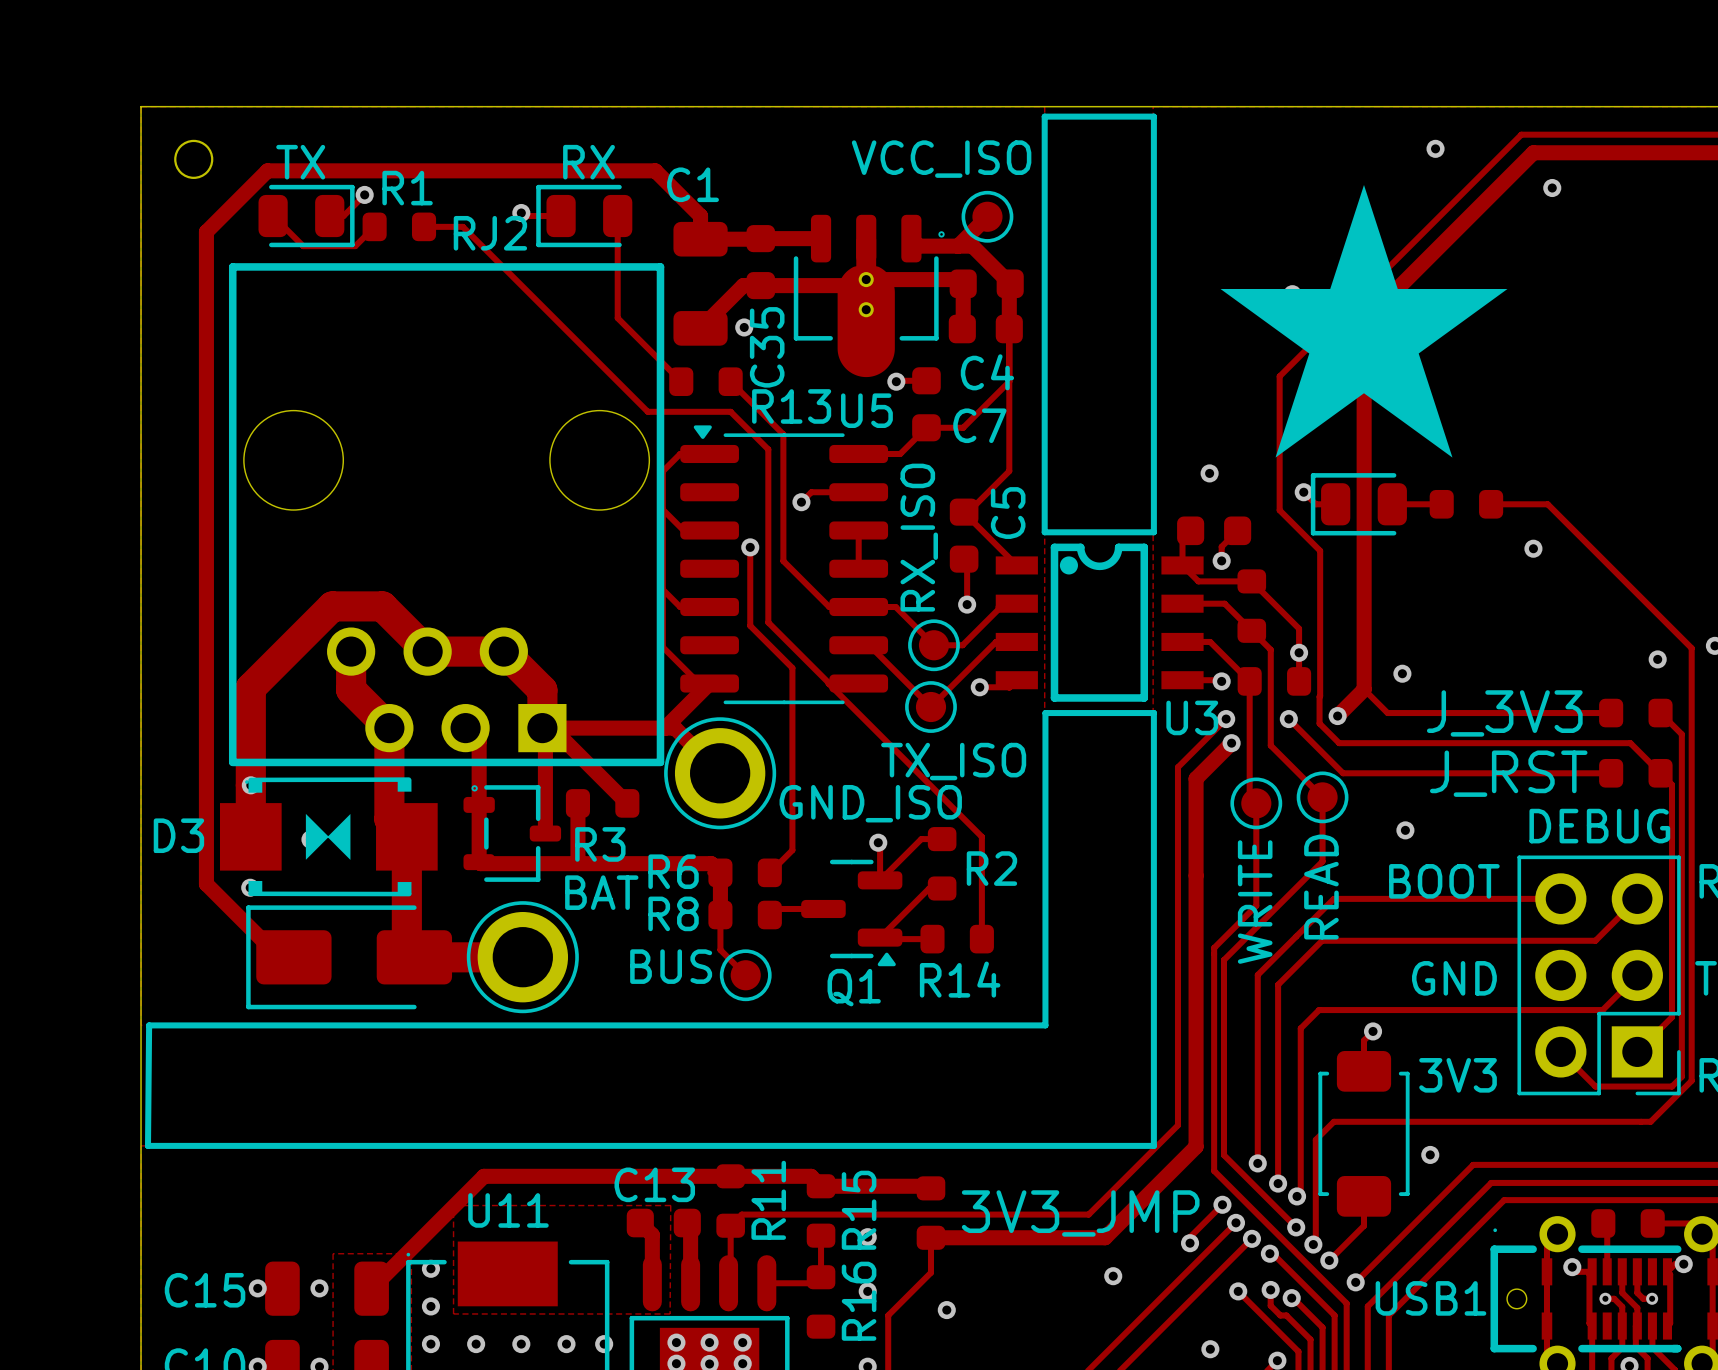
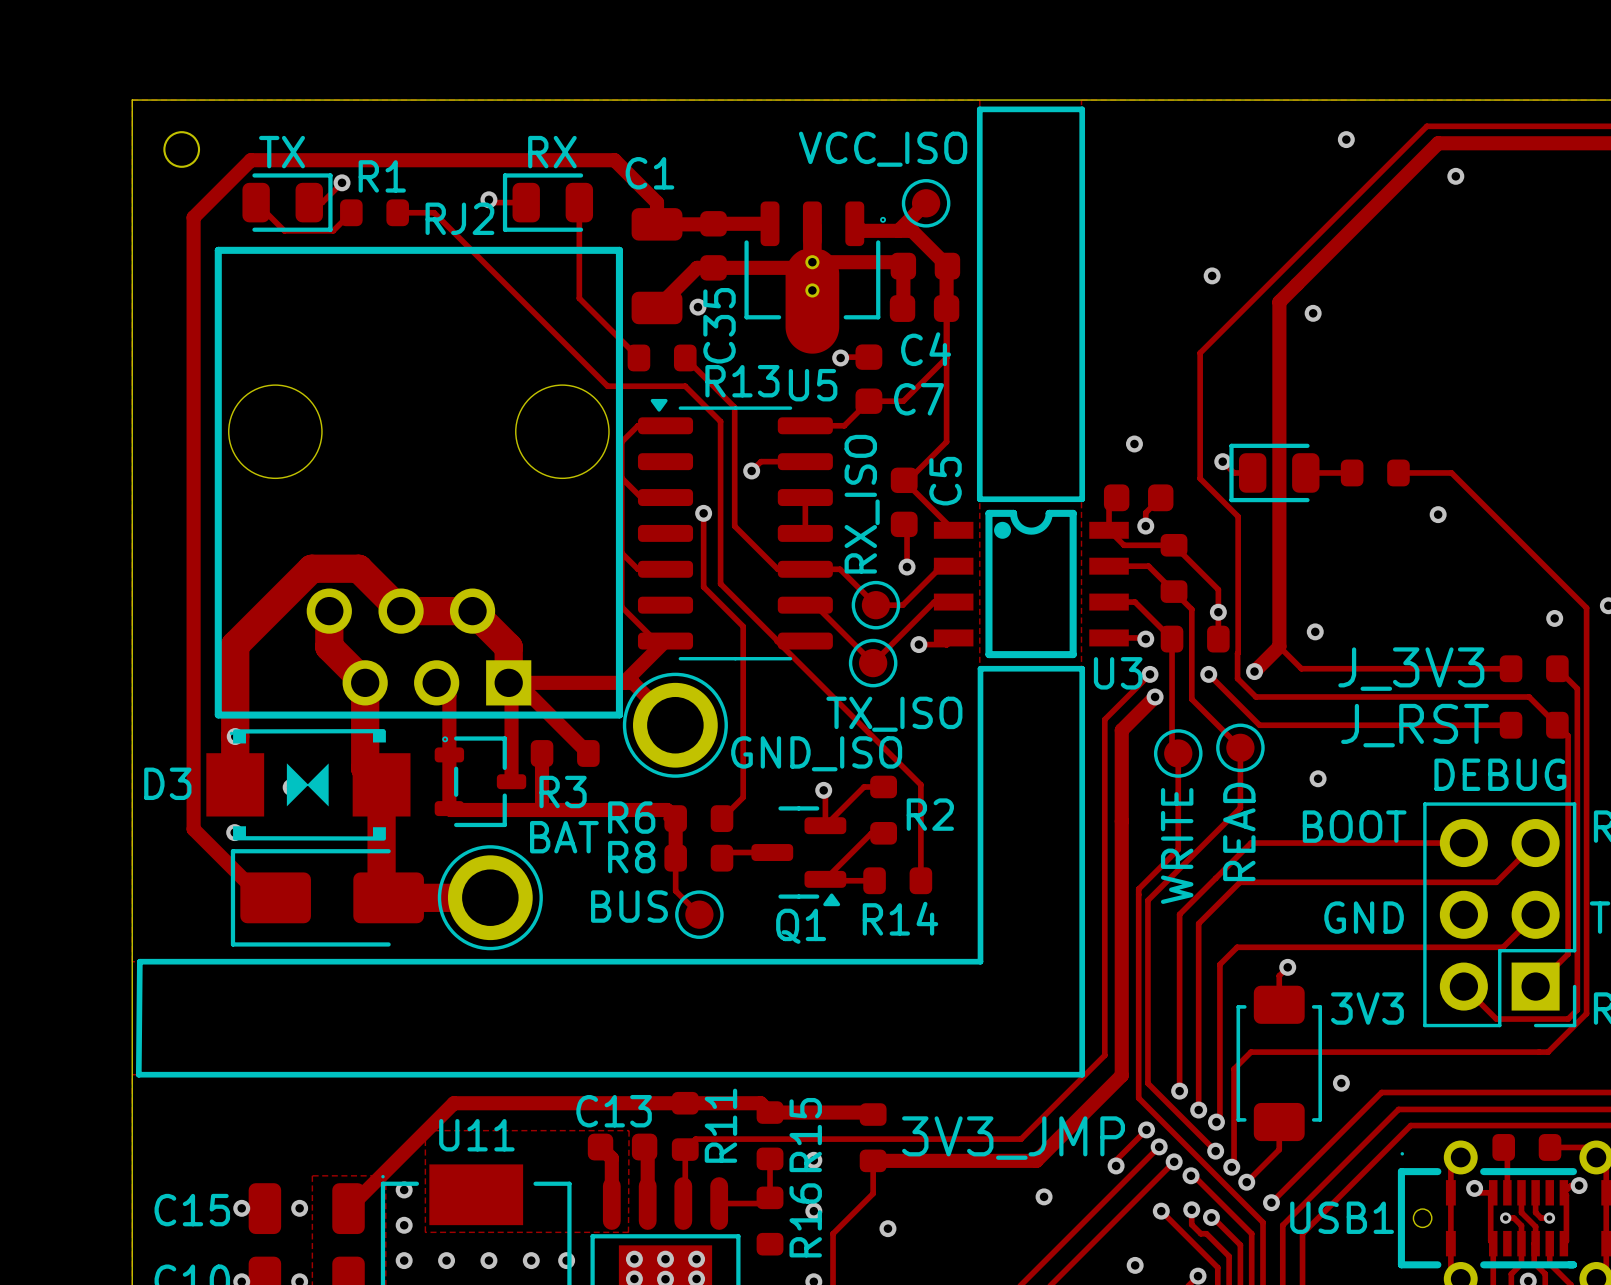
drawing: [1220, 184, 1508, 458] -> none

